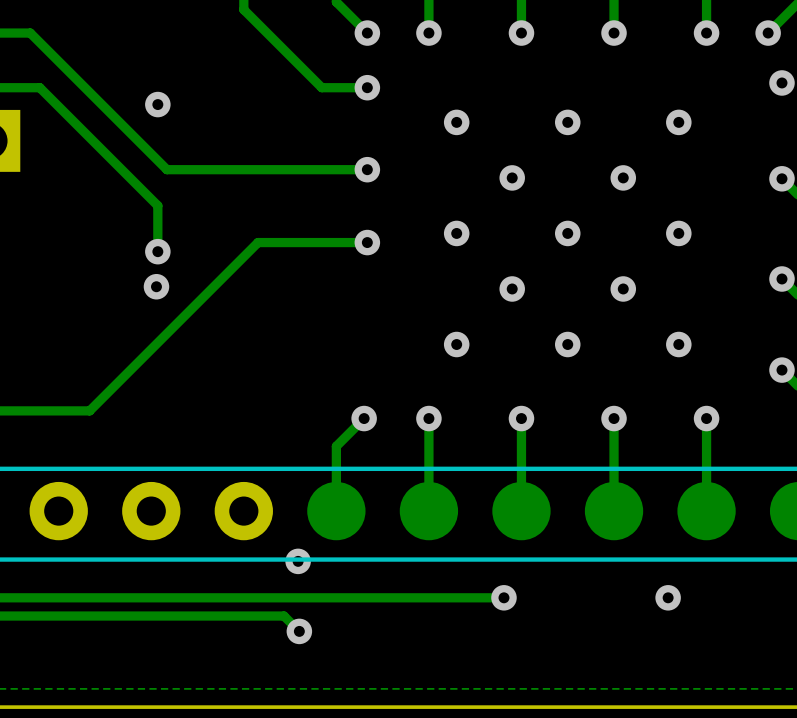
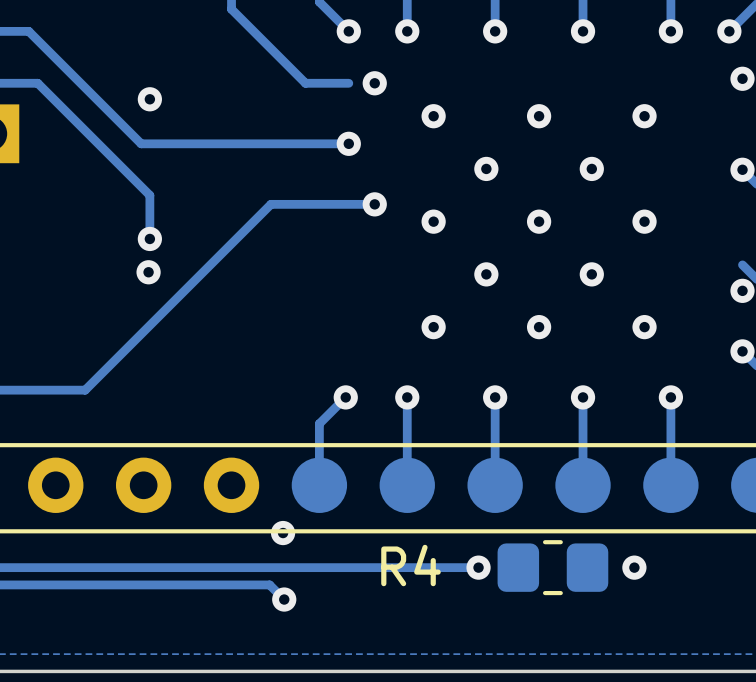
via position: (367, 87) -> (374, 83)
track: (148, 151) (166, 169) (367, 169) -> (141, 143) (348, 143)
via position: (367, 169) -> (348, 143)
via: none -> (374, 204)
track: (367, 242) (258, 242) -> (374, 204) (270, 204) (245, 230)
via: (367, 242) -> none
via position: (781, 278) -> (742, 290)
R4: none -> (552, 567)

